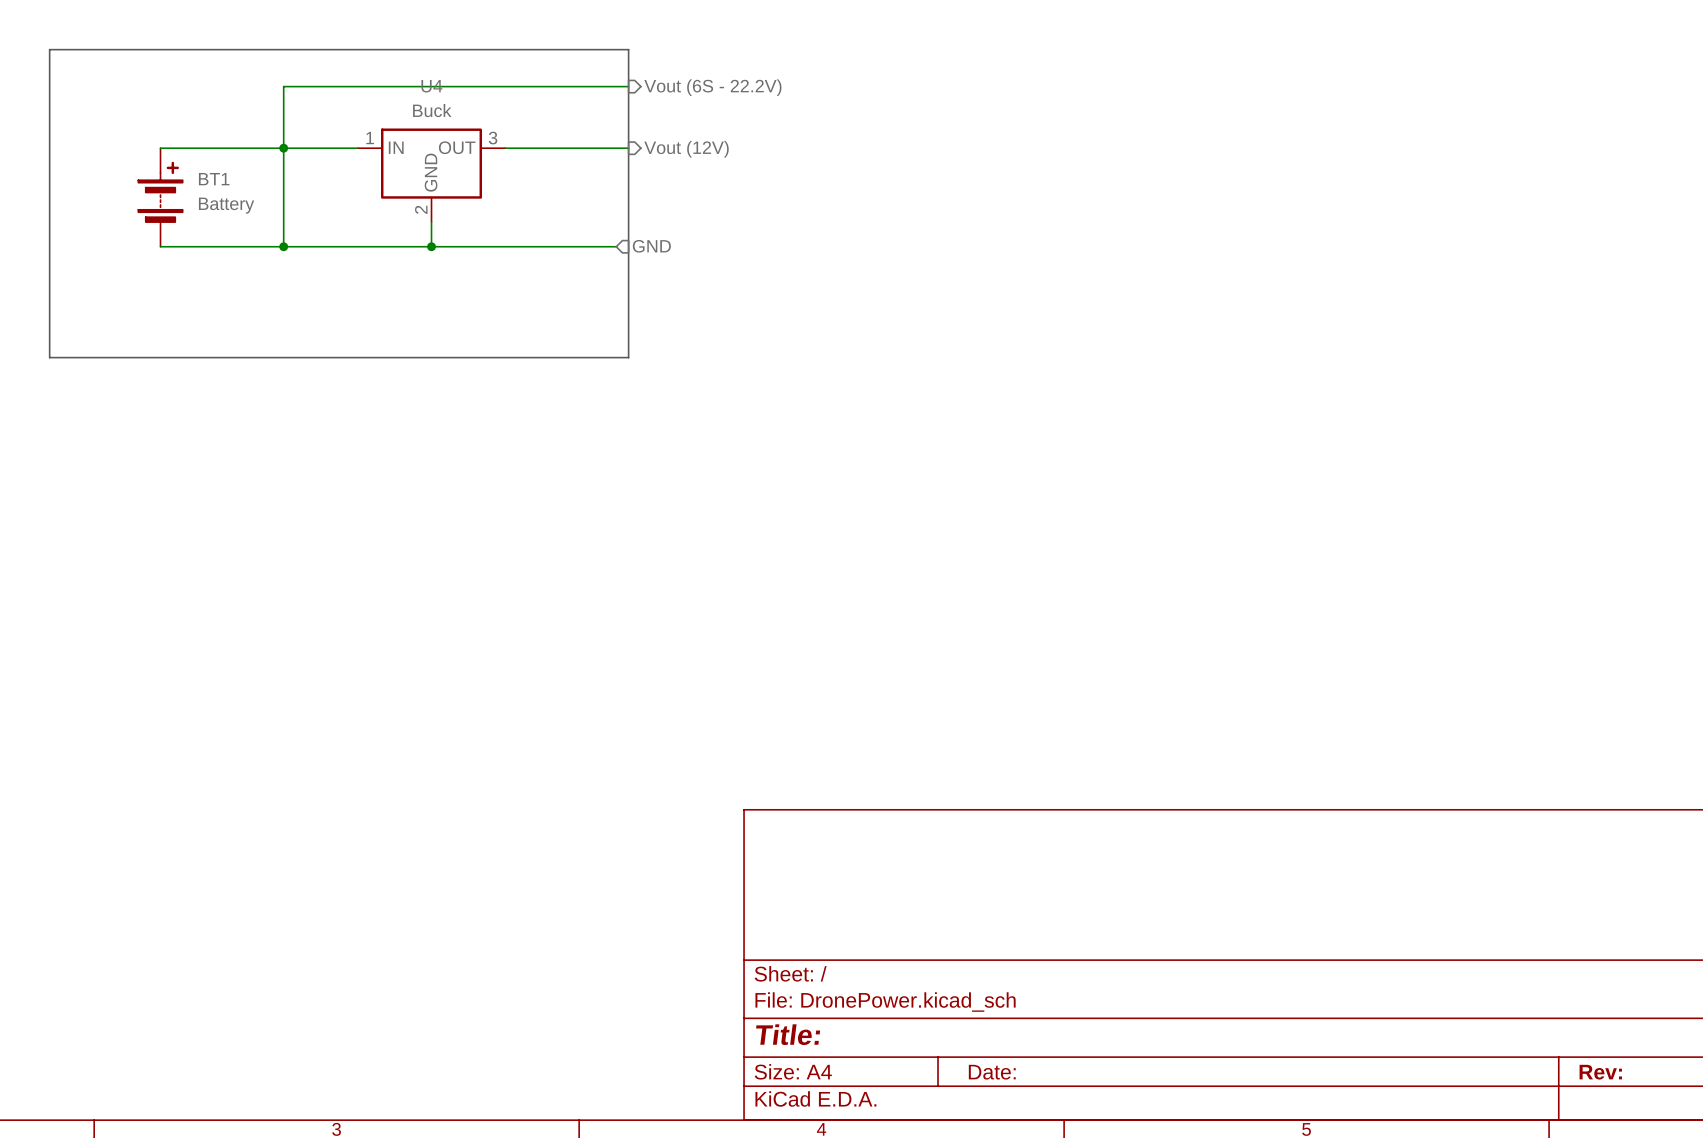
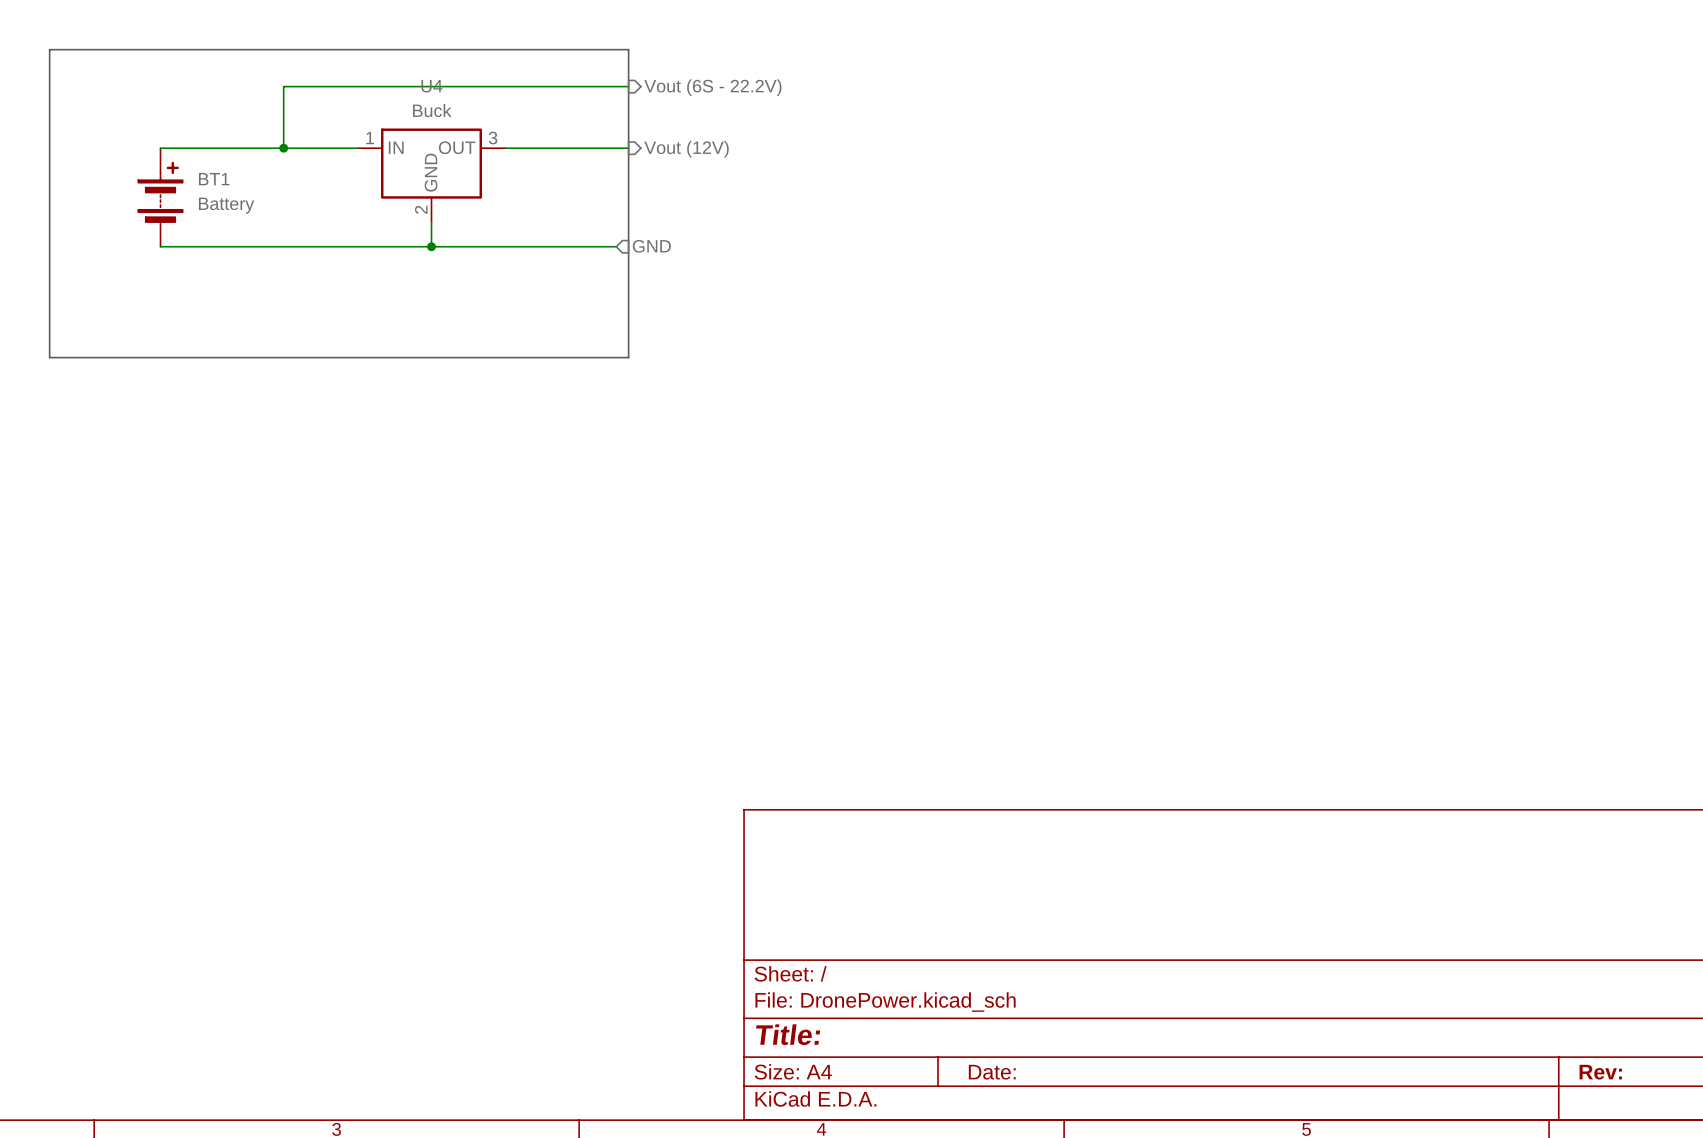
wire: (283, 148) (283, 246) -> none
junction: (283, 246) -> none

